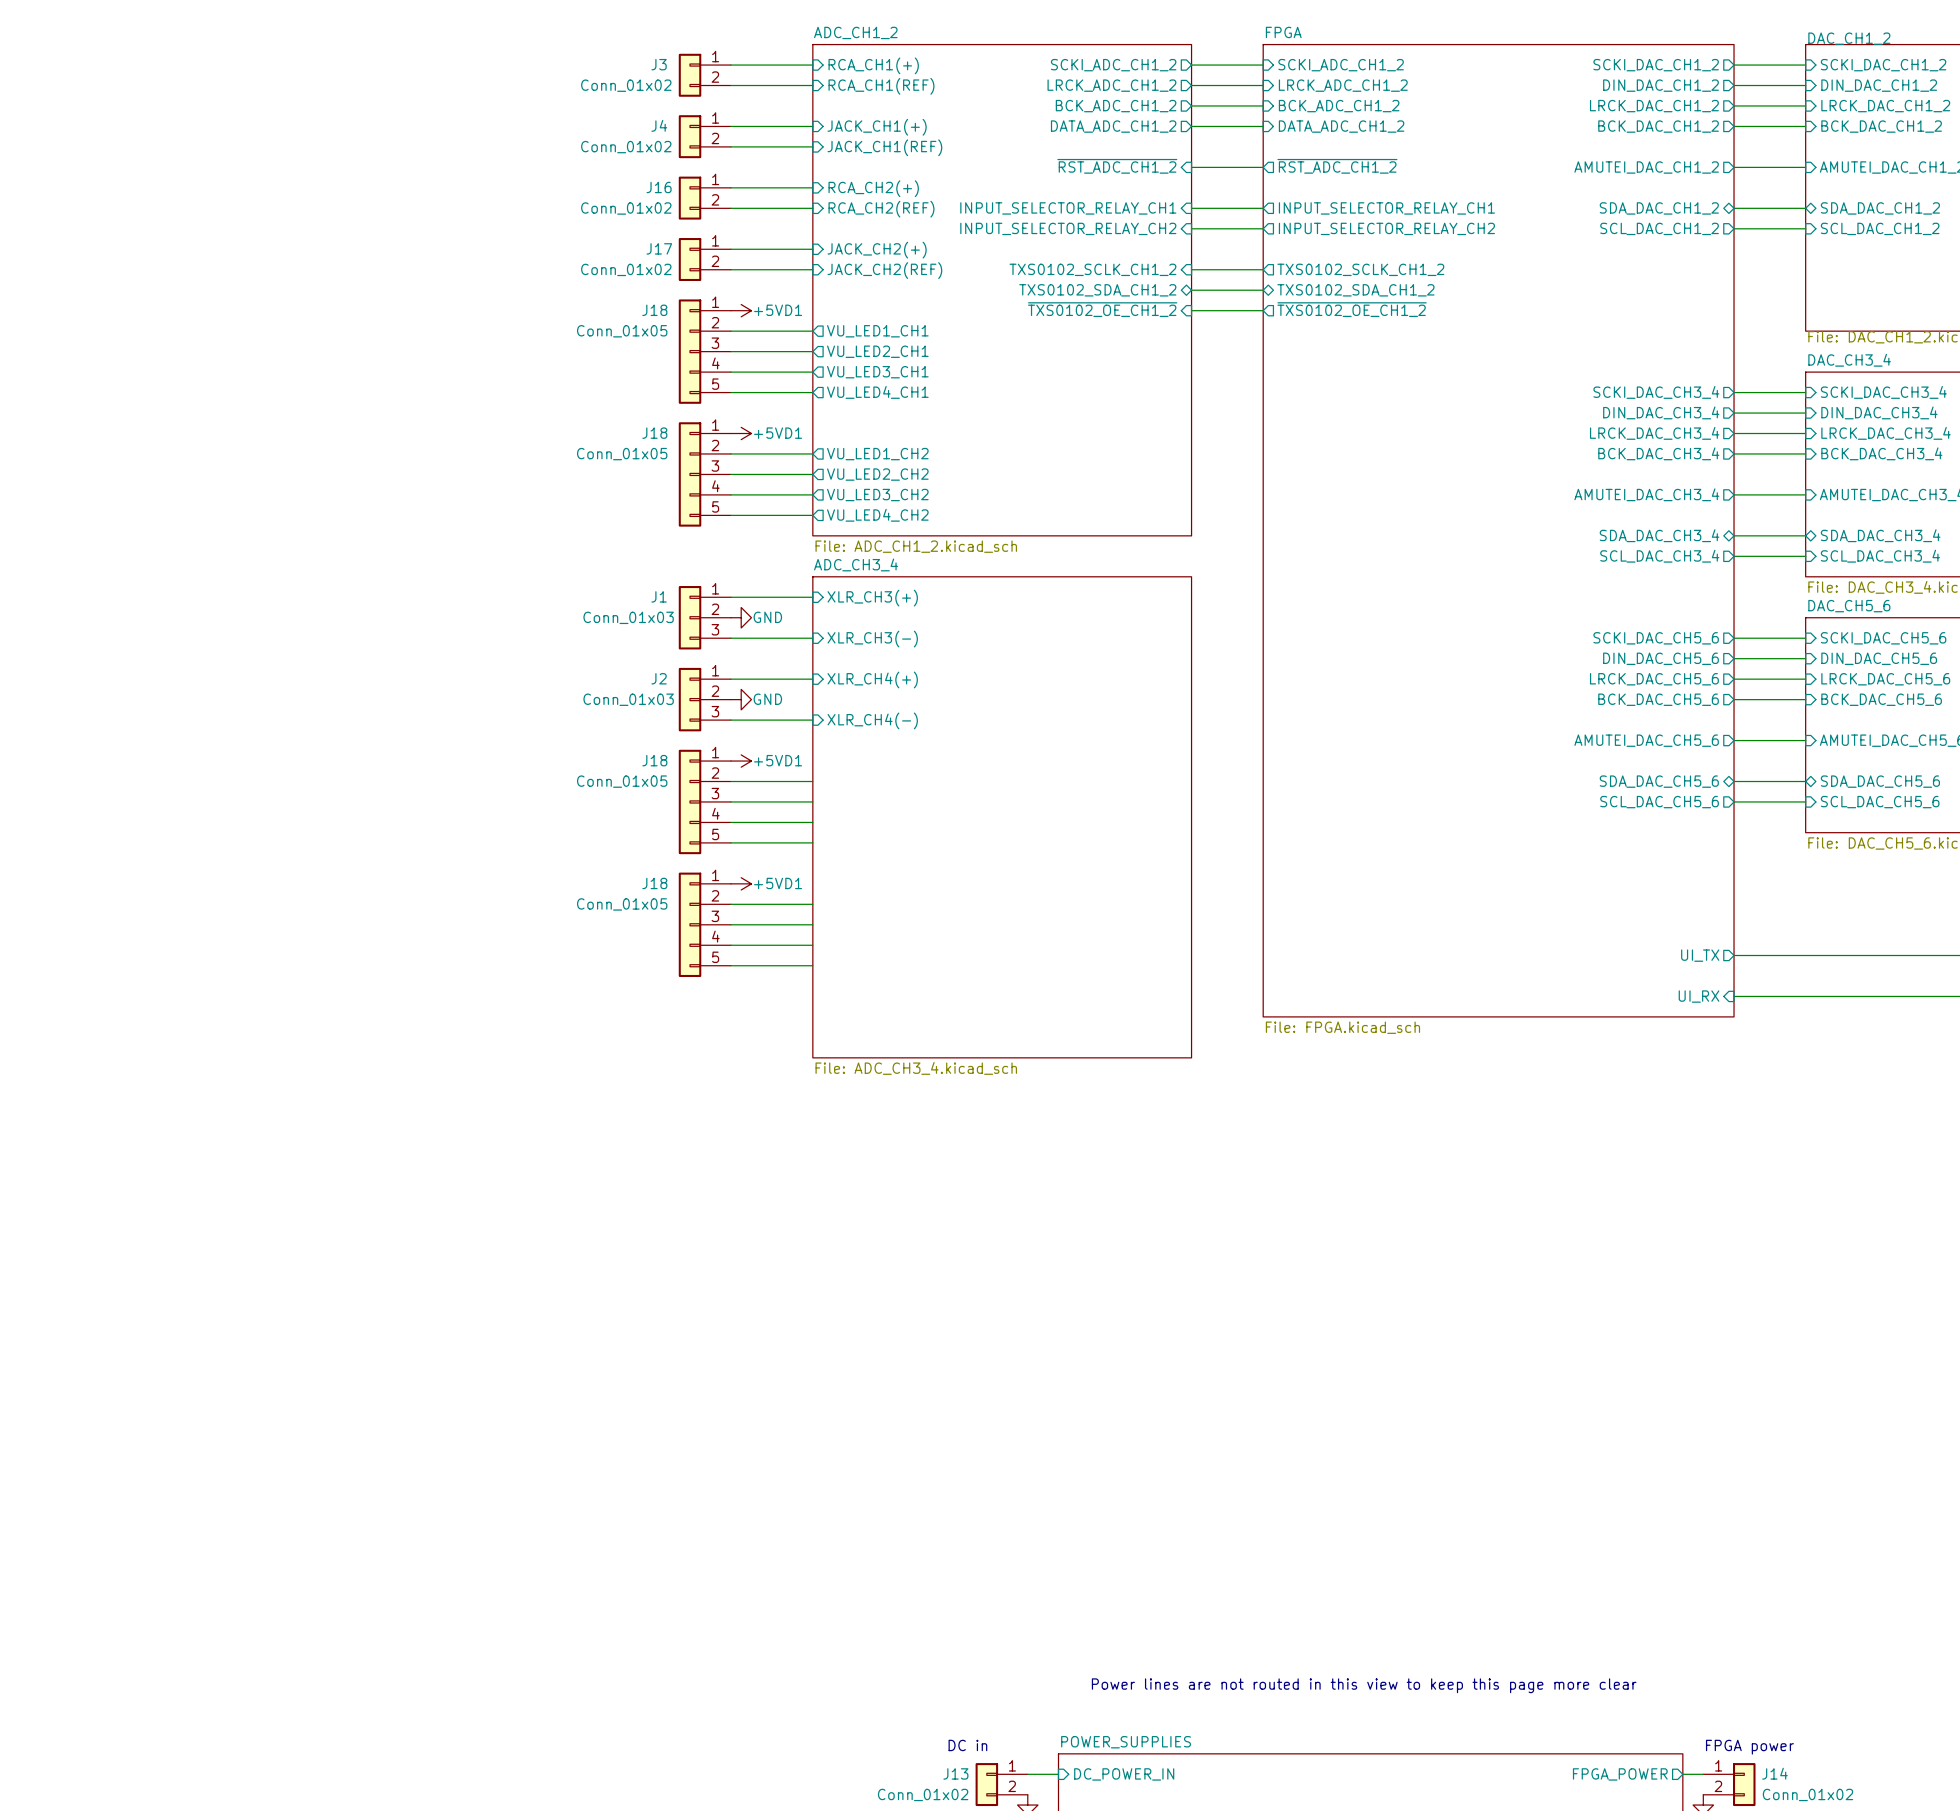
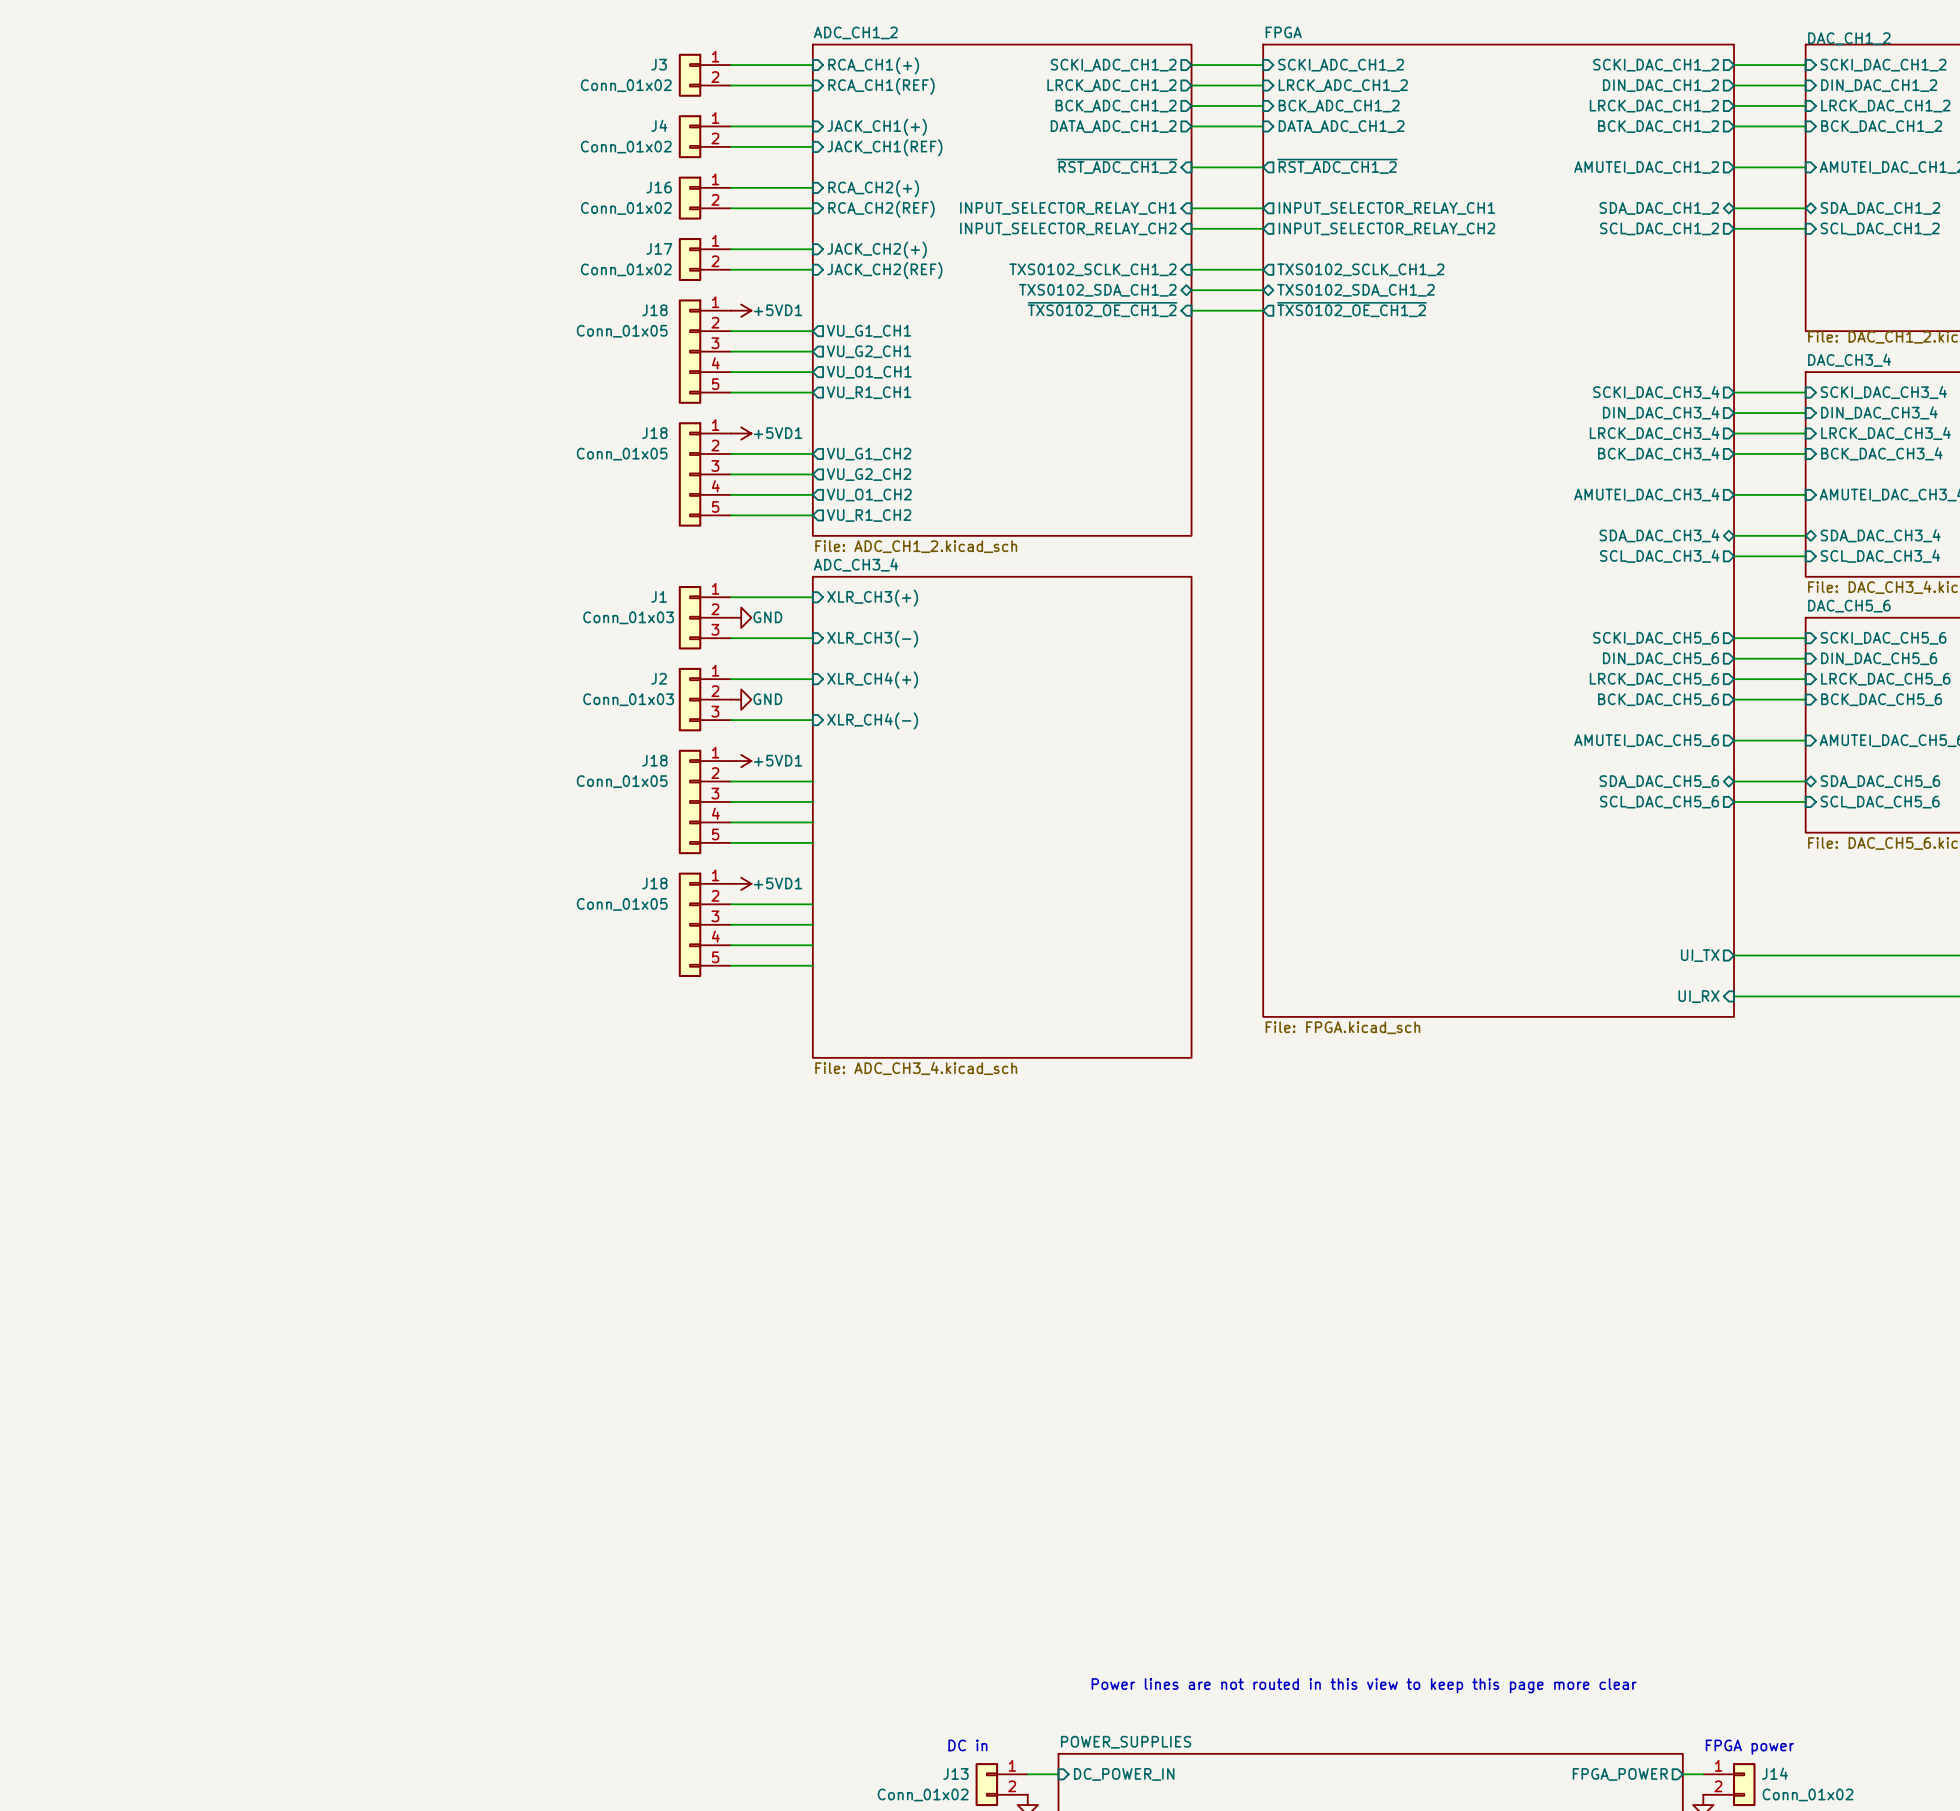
sheet pin: VU_LED1_CH1 (877, 331) -> VU_G1_CH1 (869, 331)
sheet pin: VU_LED2_CH1 (877, 351) -> VU_G2_CH1 (869, 351)
sheet pin: VU_LED3_CH1 (877, 372) -> VU_O1_CH1 (869, 372)
sheet pin: VU_LED4_CH1 (877, 392) -> VU_R1_CH1 (869, 392)
sheet pin: VU_LED1_CH2 (877, 454) -> VU_G1_CH2 (869, 454)
sheet pin: VU_LED2_CH2 (877, 474) -> VU_G2_CH2 (869, 474)
sheet pin: VU_LED3_CH2 (877, 495) -> VU_O1_CH2 (869, 495)
sheet pin: VU_LED4_CH2 (877, 515) -> VU_R1_CH2 (869, 515)

